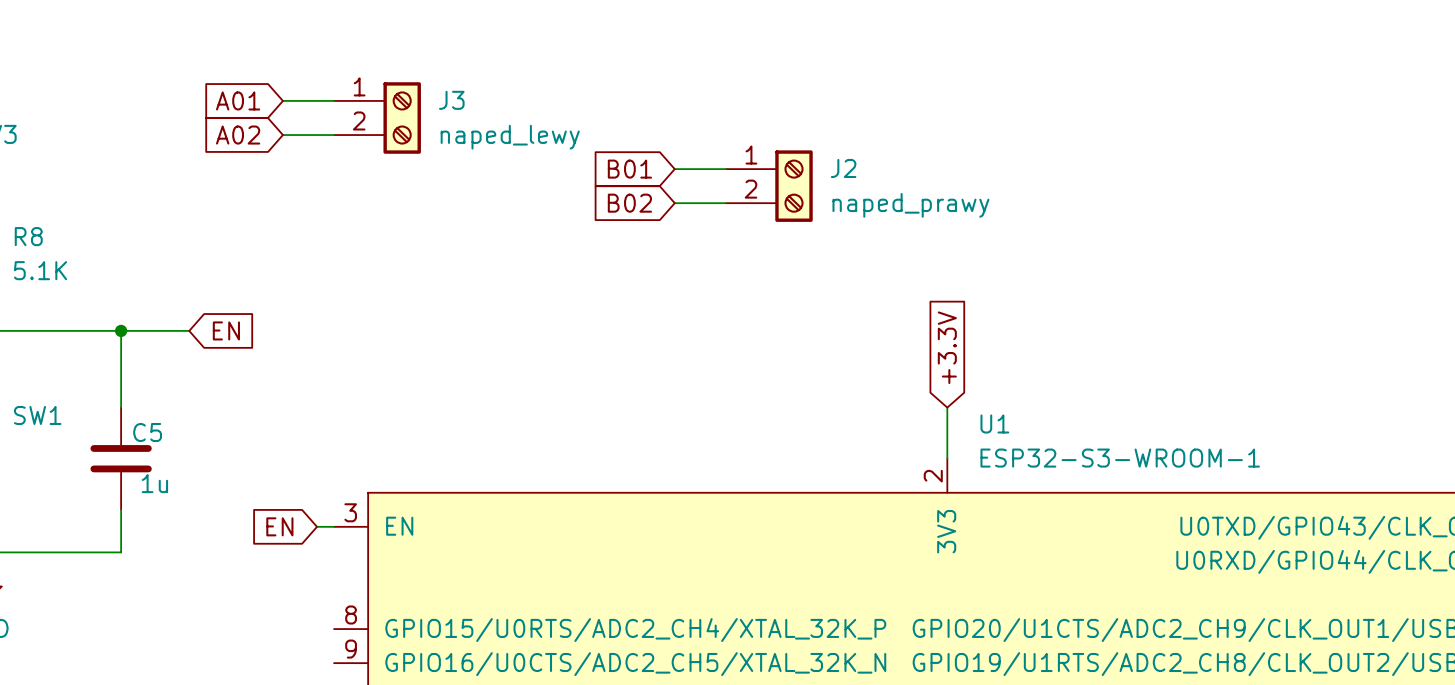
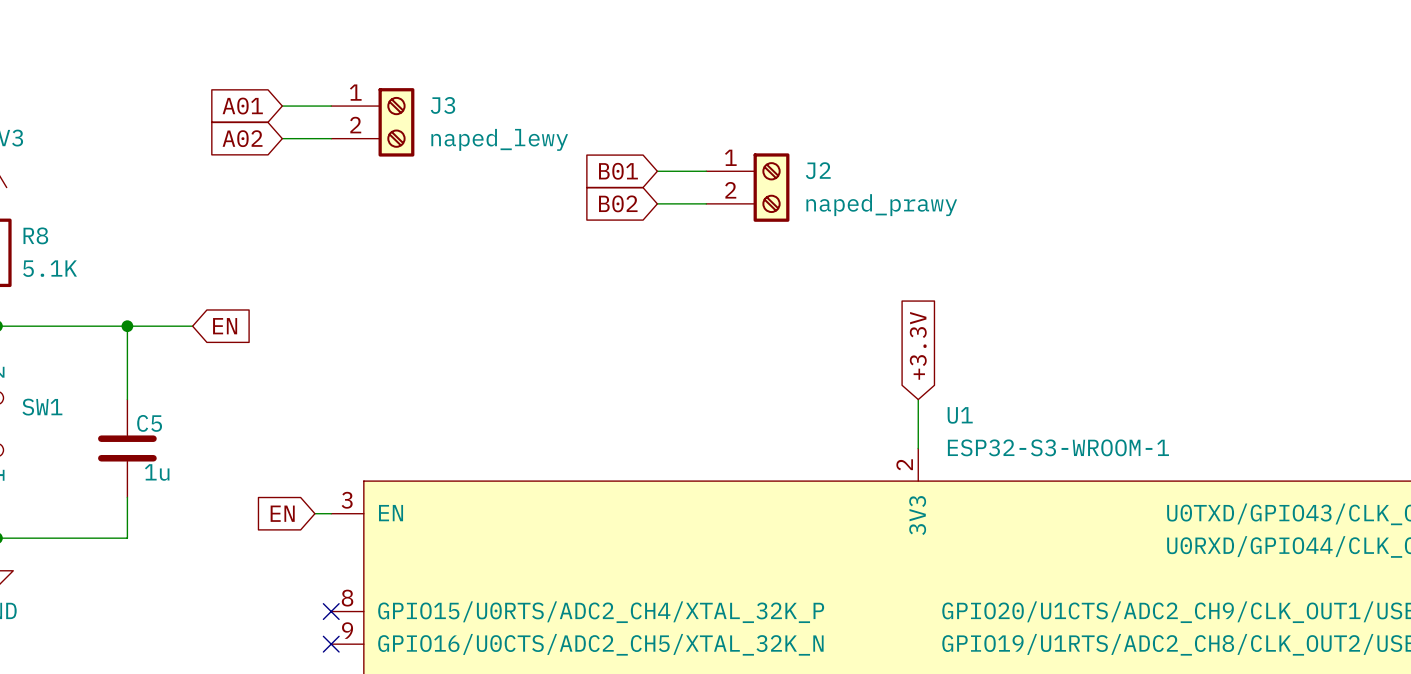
no-connect mark: none -> (331, 611)
no-connect mark: none -> (331, 644)

